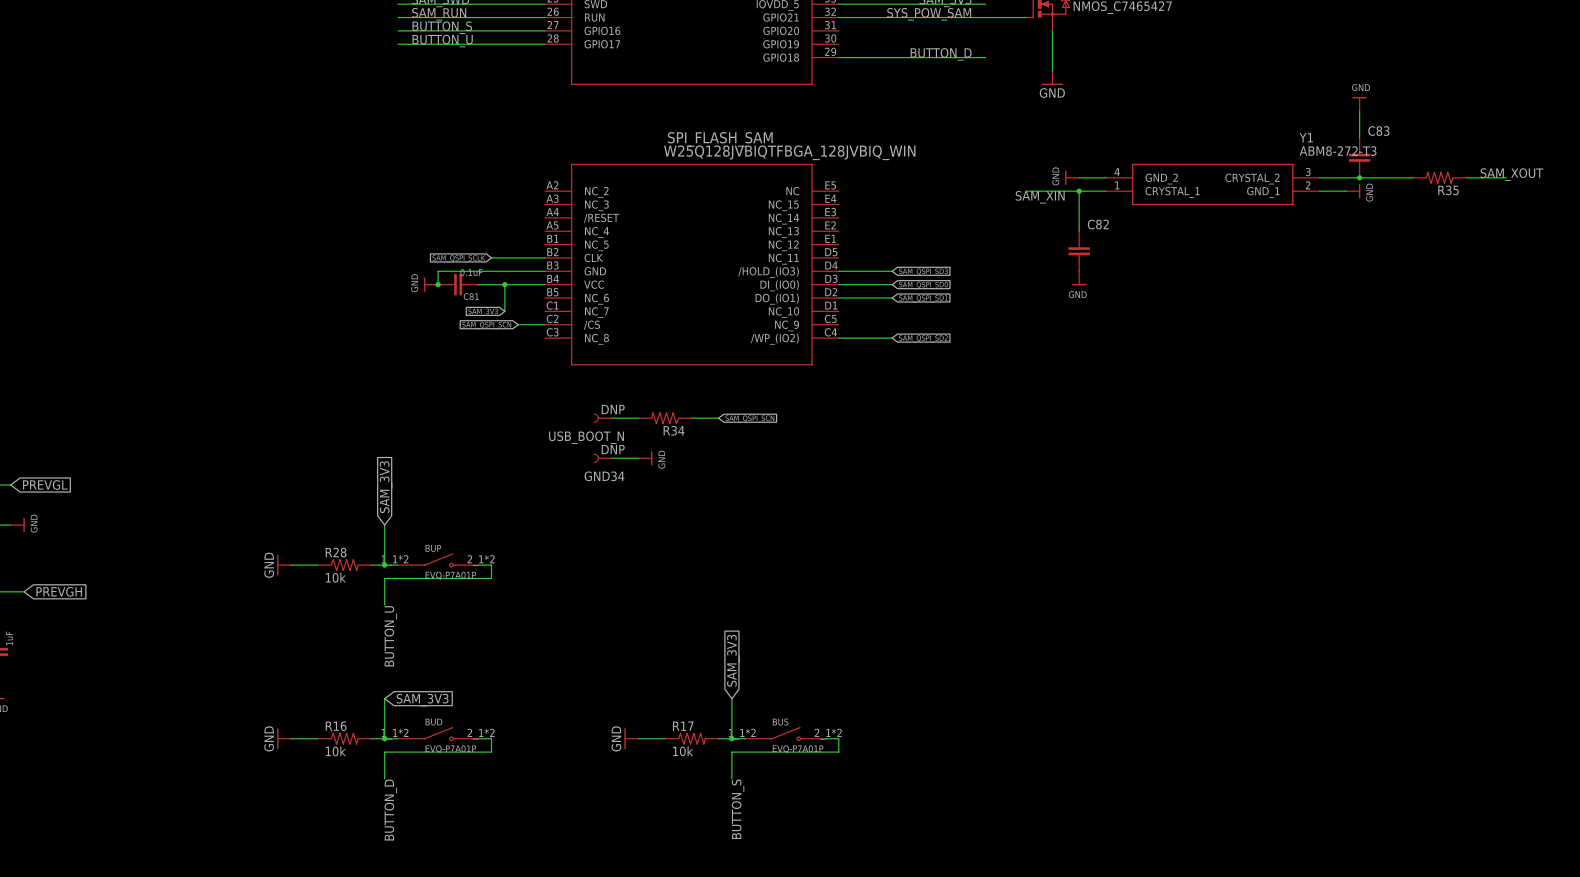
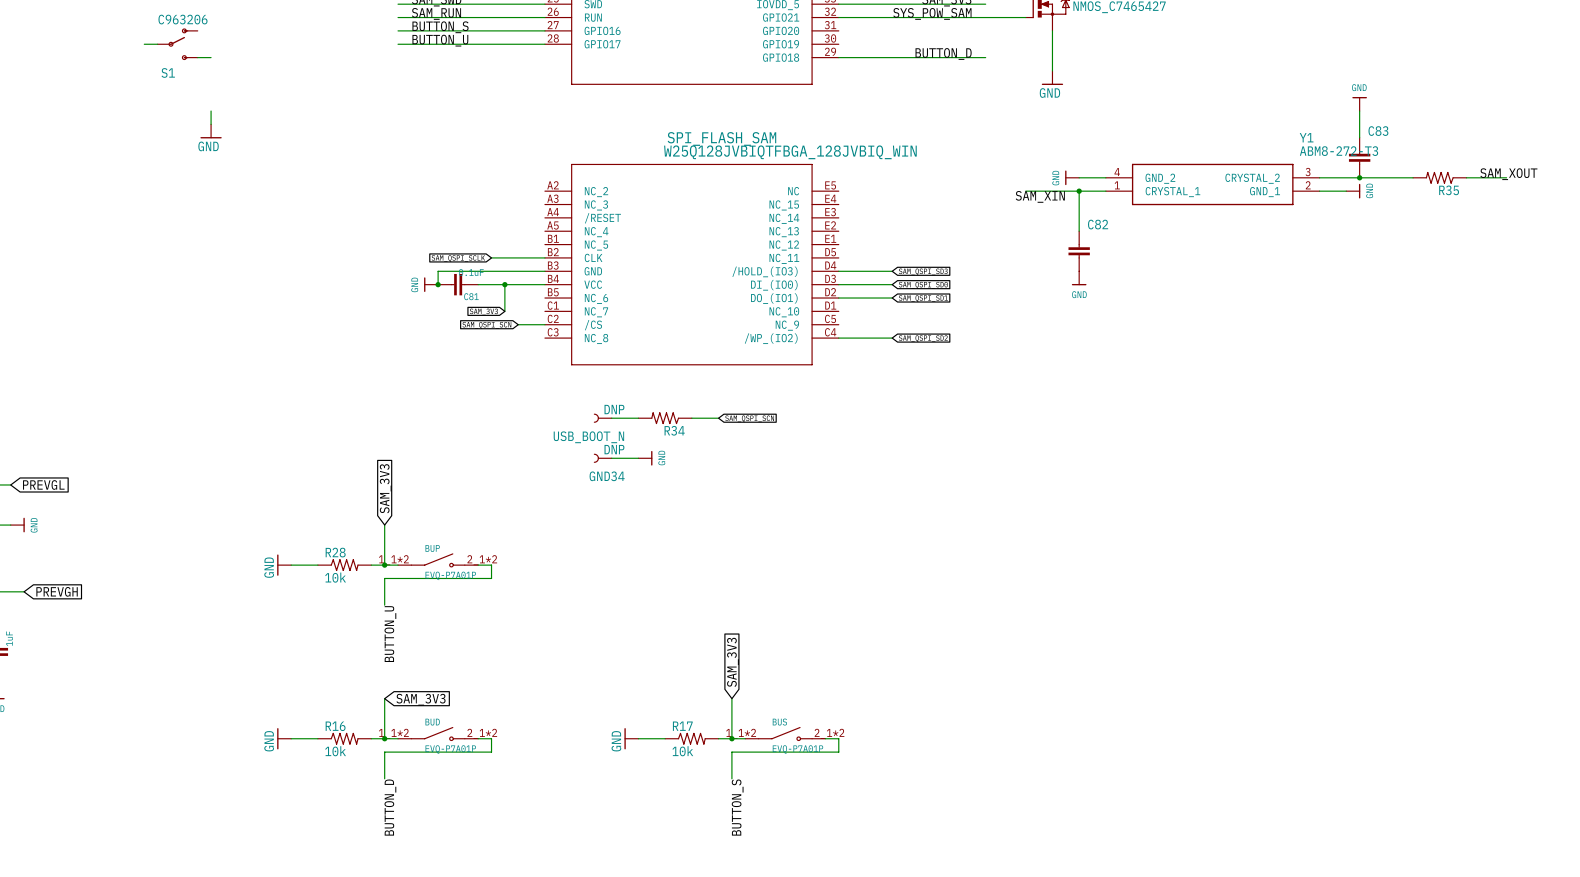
wire: none -> (144, 44) (157, 44)
S1: none -> C963206 (177, 44)
wire: none -> (197, 57) (211, 57)
wire: none -> (211, 111) (211, 124)
power symbol: none -> GND (211, 131)

